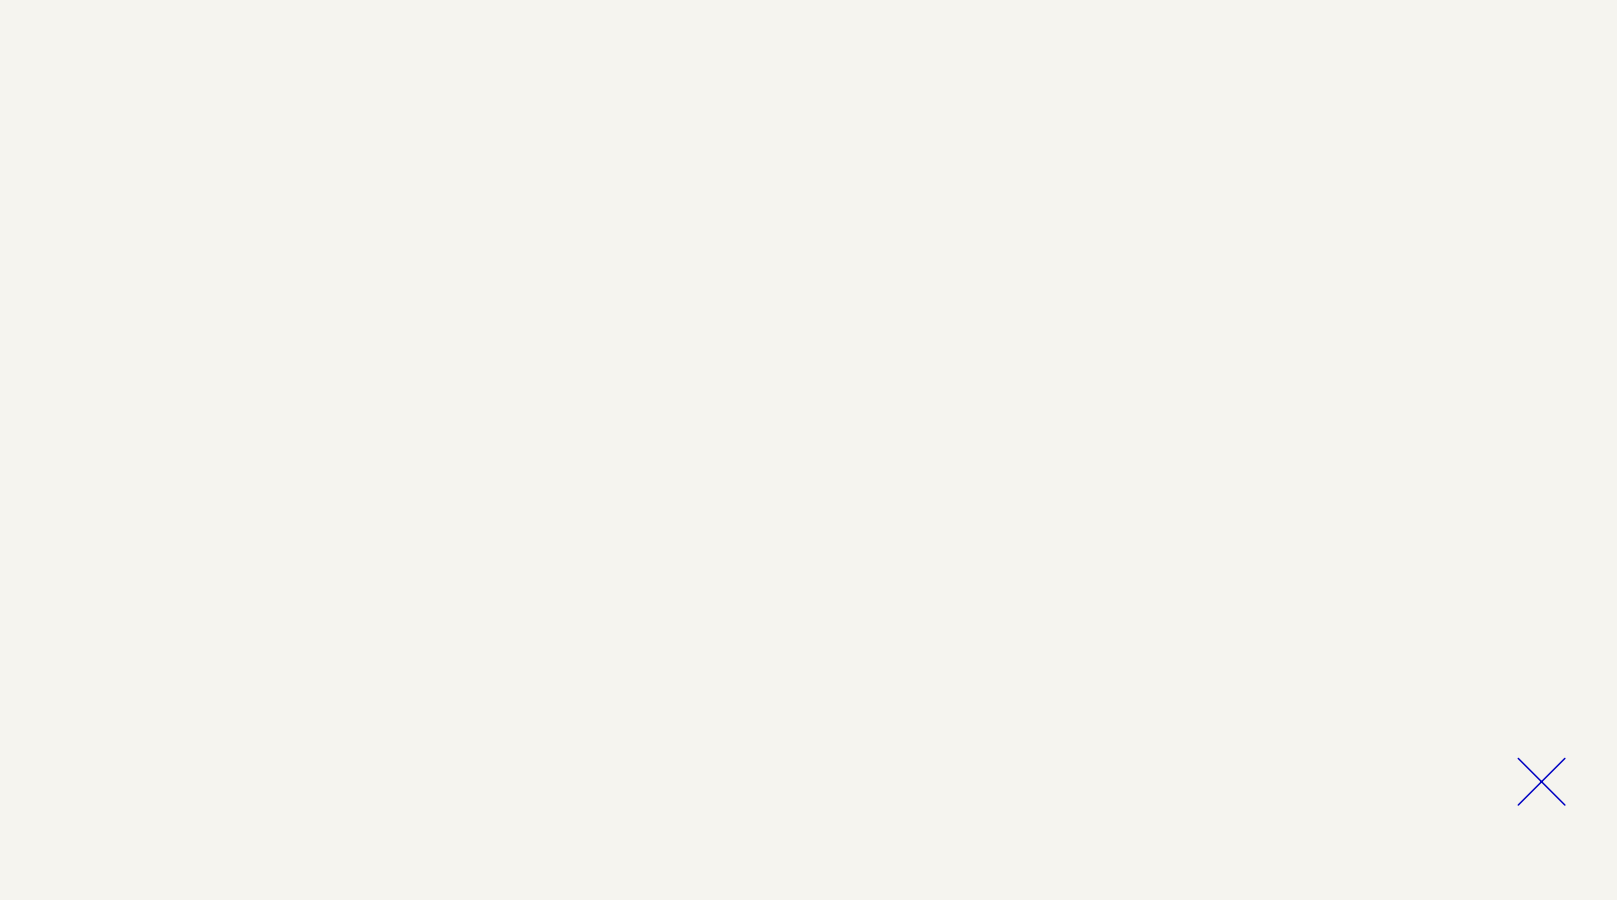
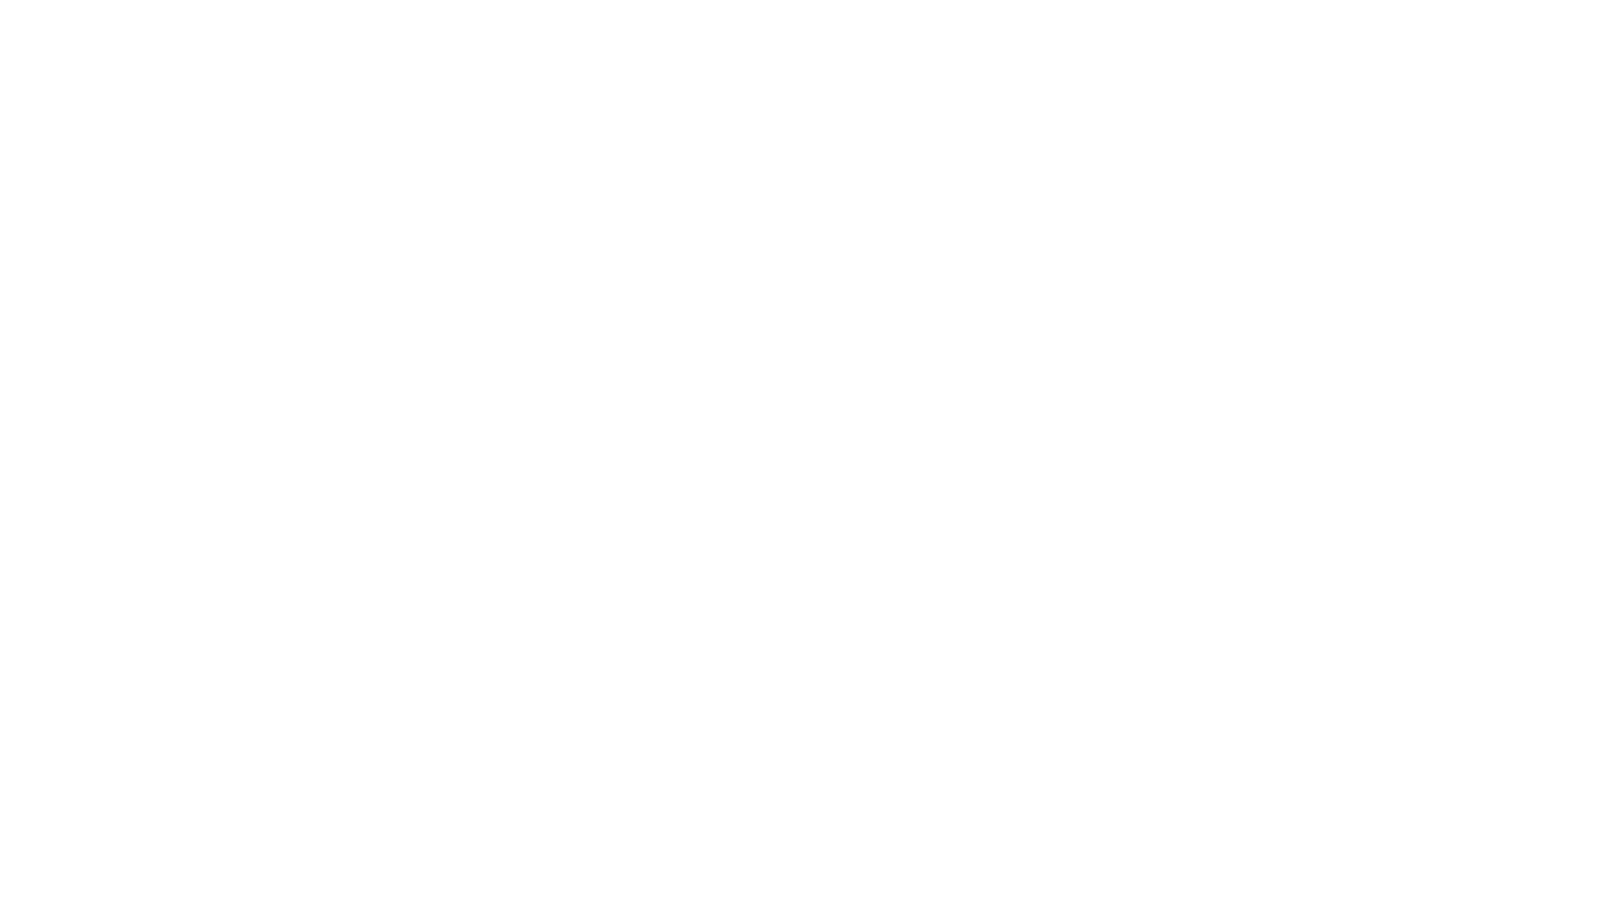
no-connect mark: (1541, 781) -> none

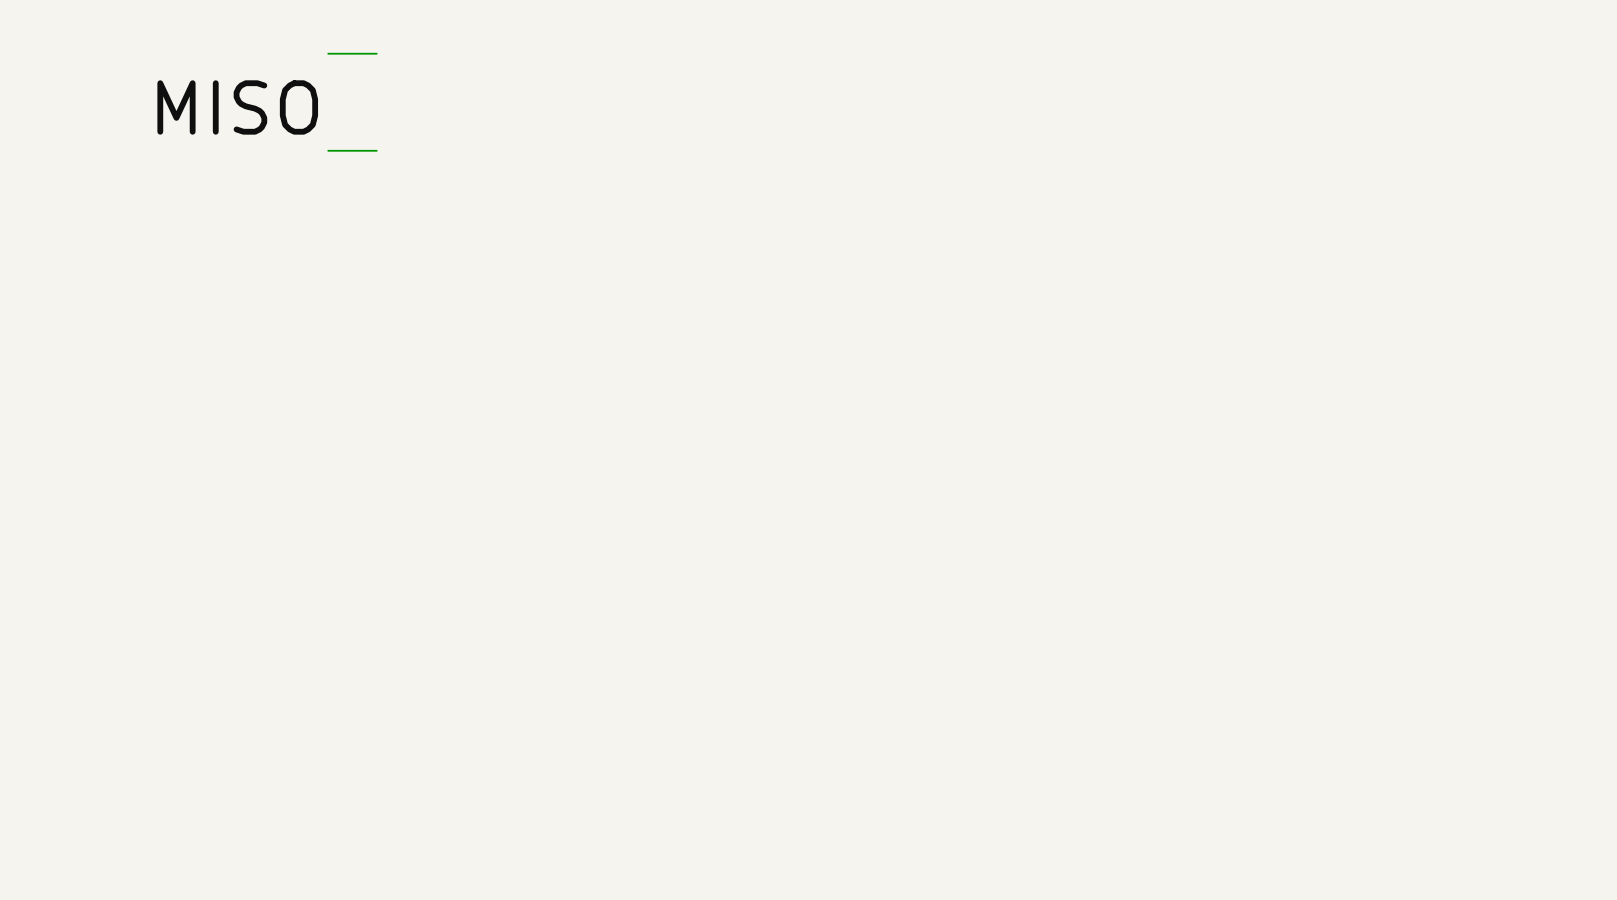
wire: none -> (328, 53) (376, 53)
label: none -> MISO (237, 107)
wire: none -> (328, 150) (376, 150)

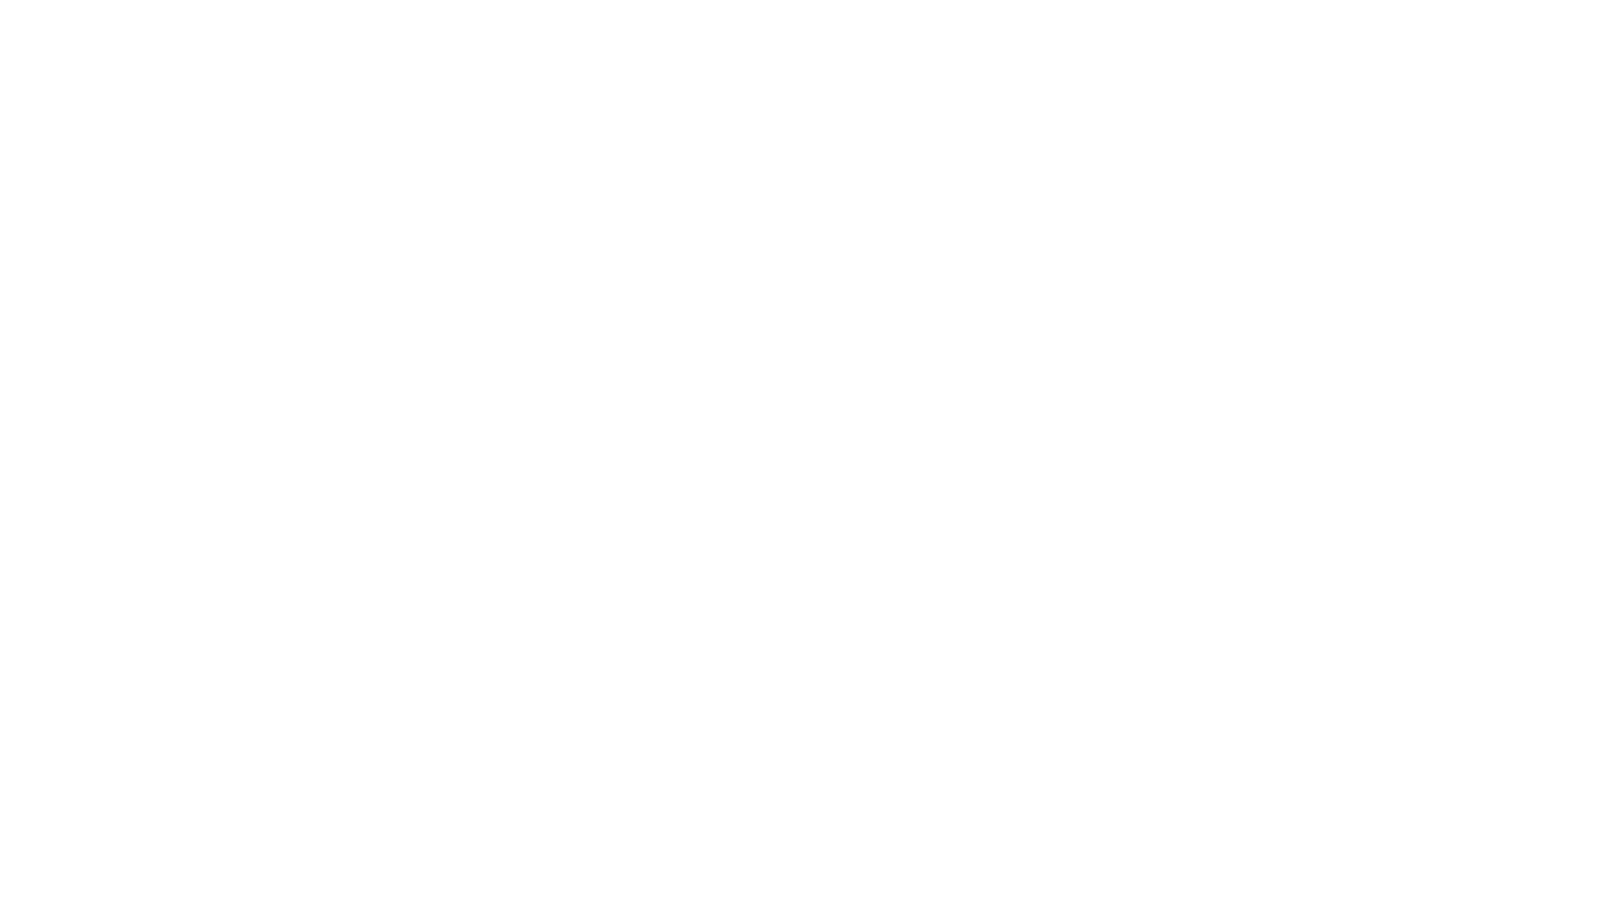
wire: (328, 53) (376, 53) -> none
label: MISO (237, 107) -> none
wire: (328, 150) (376, 150) -> none

